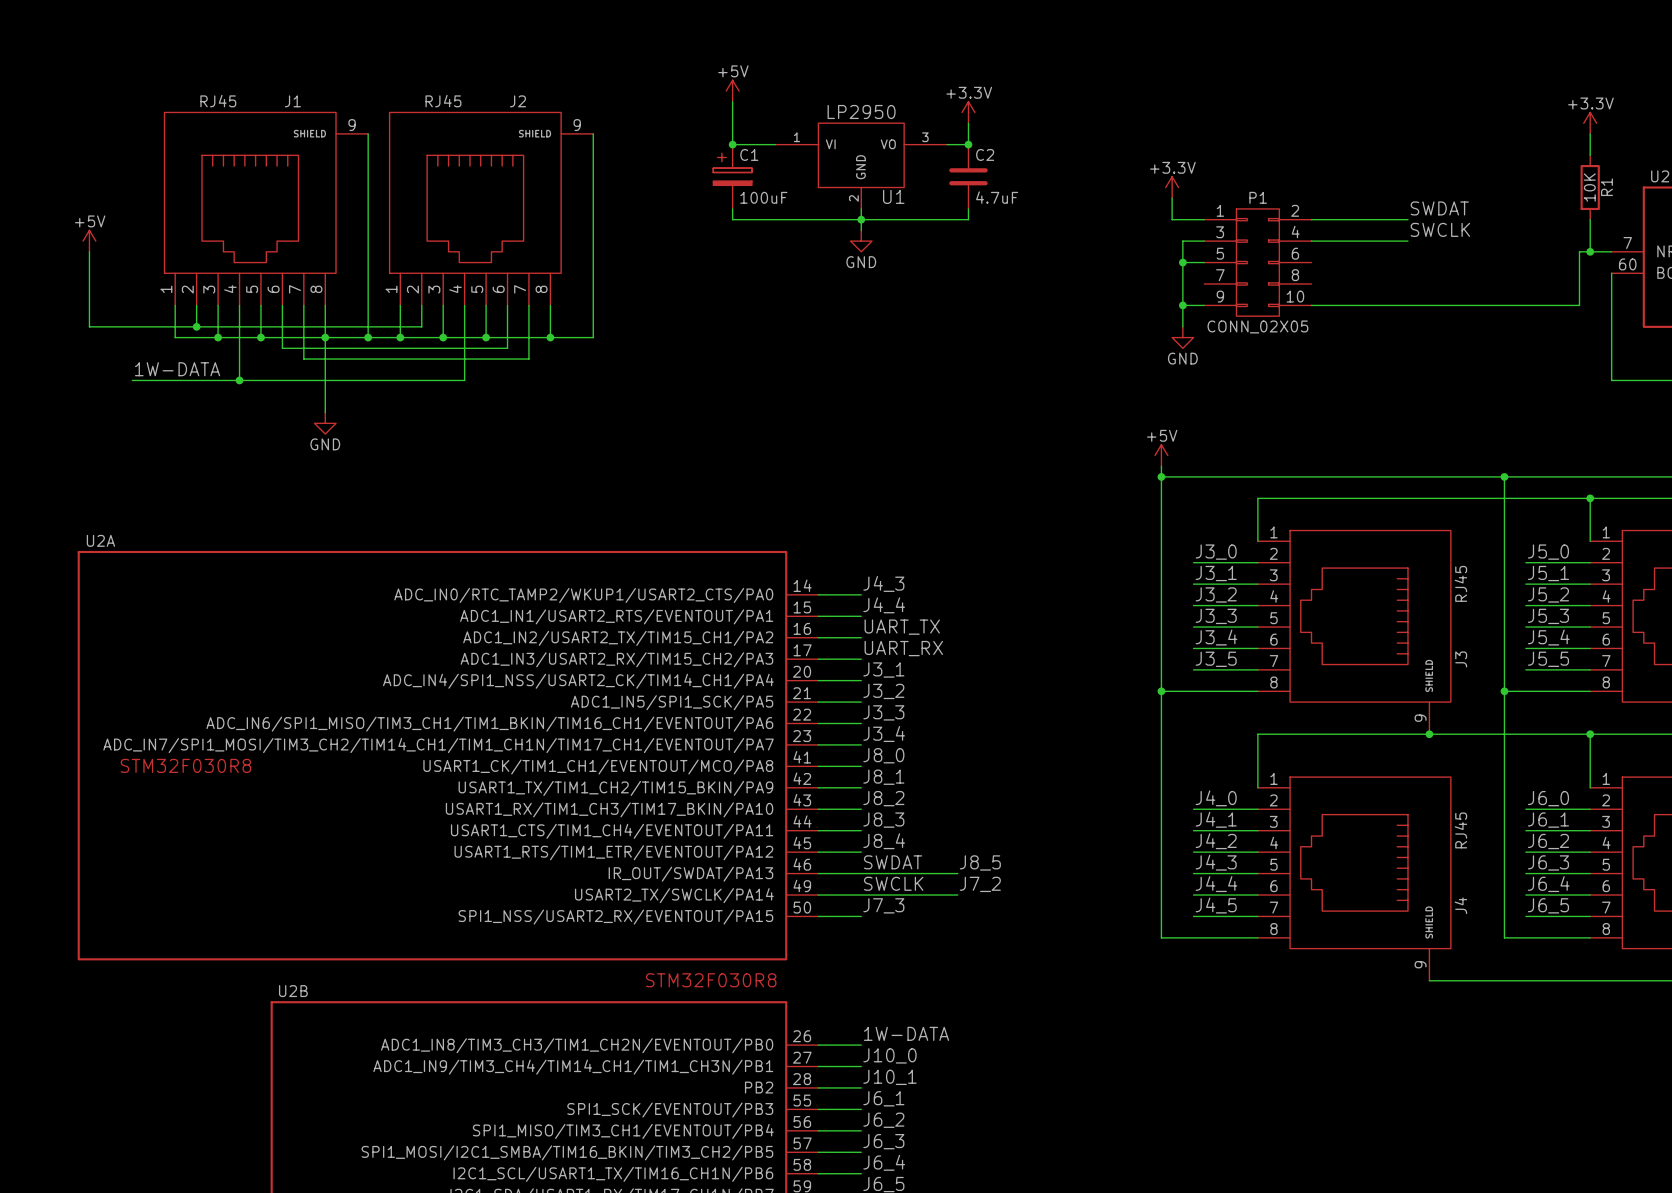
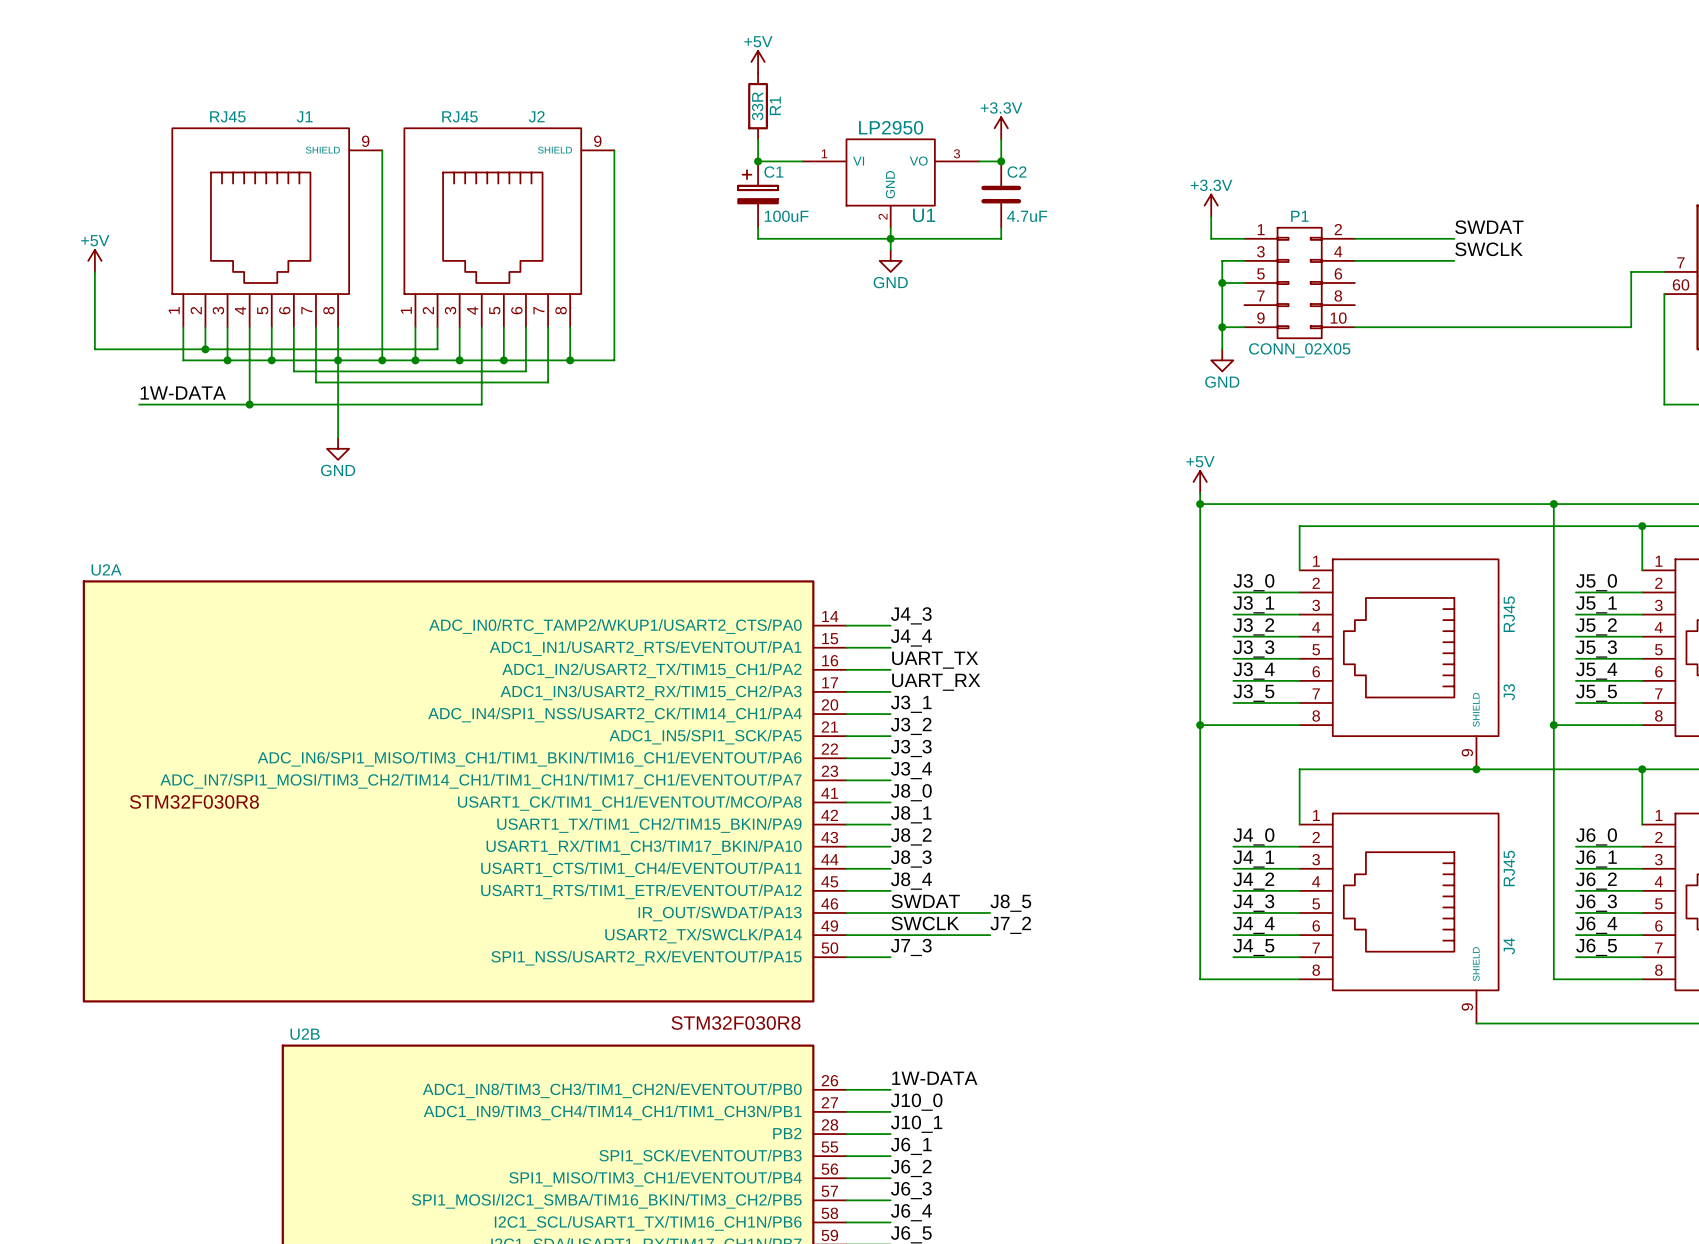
power symbol position: +5V (732, 91) -> +5V (758, 61)
power symbol: +3.3V (1590, 123) -> none
wire: (1590, 133) (1590, 155) -> none
R1 value: 10K (1589, 187) -> 33R (757, 106)
R1 position: (1590, 187) -> (758, 106)
wire: (1590, 219) (1590, 251) -> none
junction: (1590, 251) -> none

